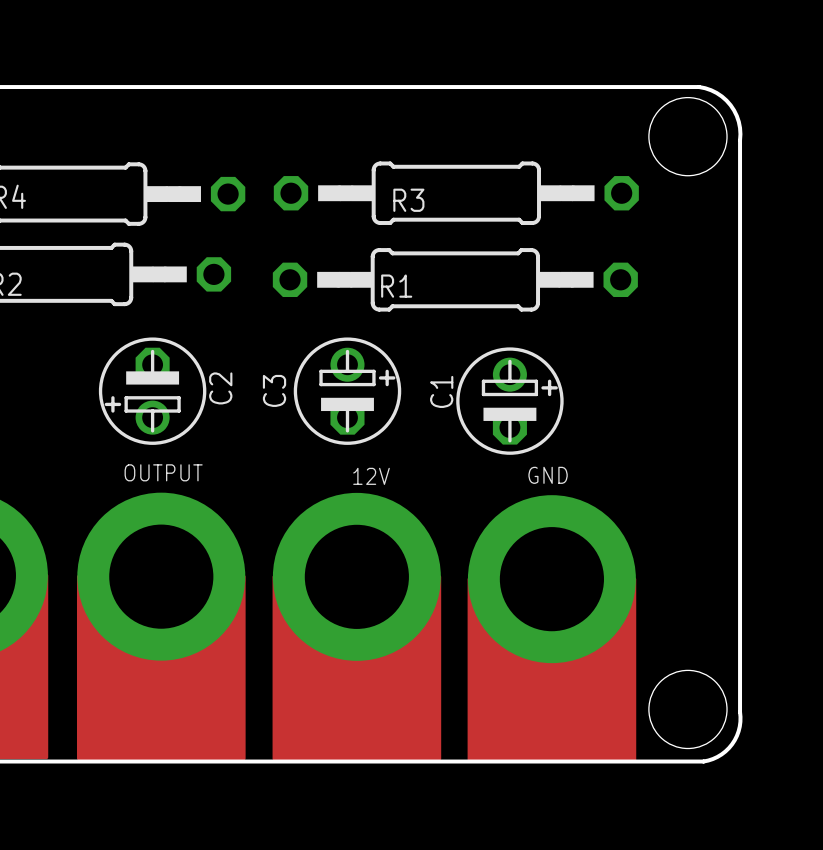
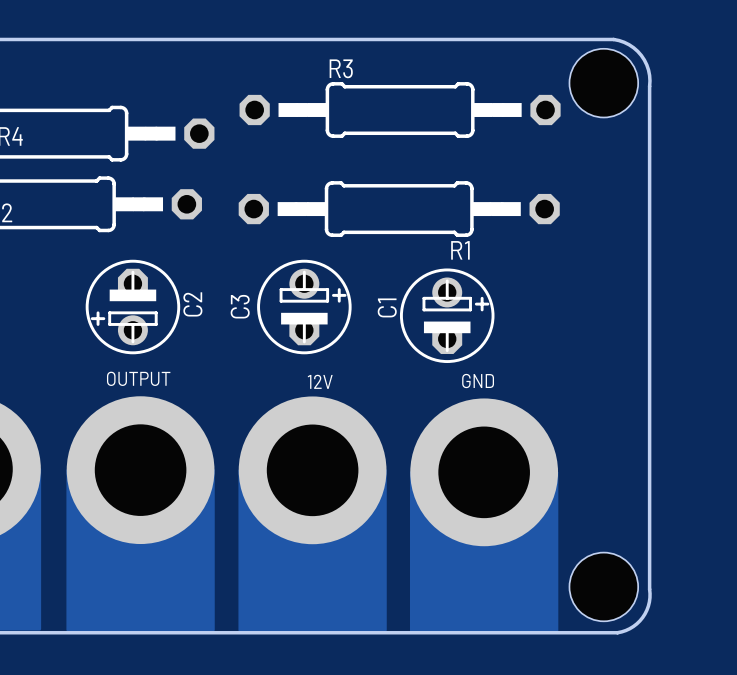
R3 position: (456, 193) -> (400, 110)
R3 name position: R3 (408, 200) -> R3 (341, 68)
R1 name position: R1 (396, 286) -> R1 (460, 250)

